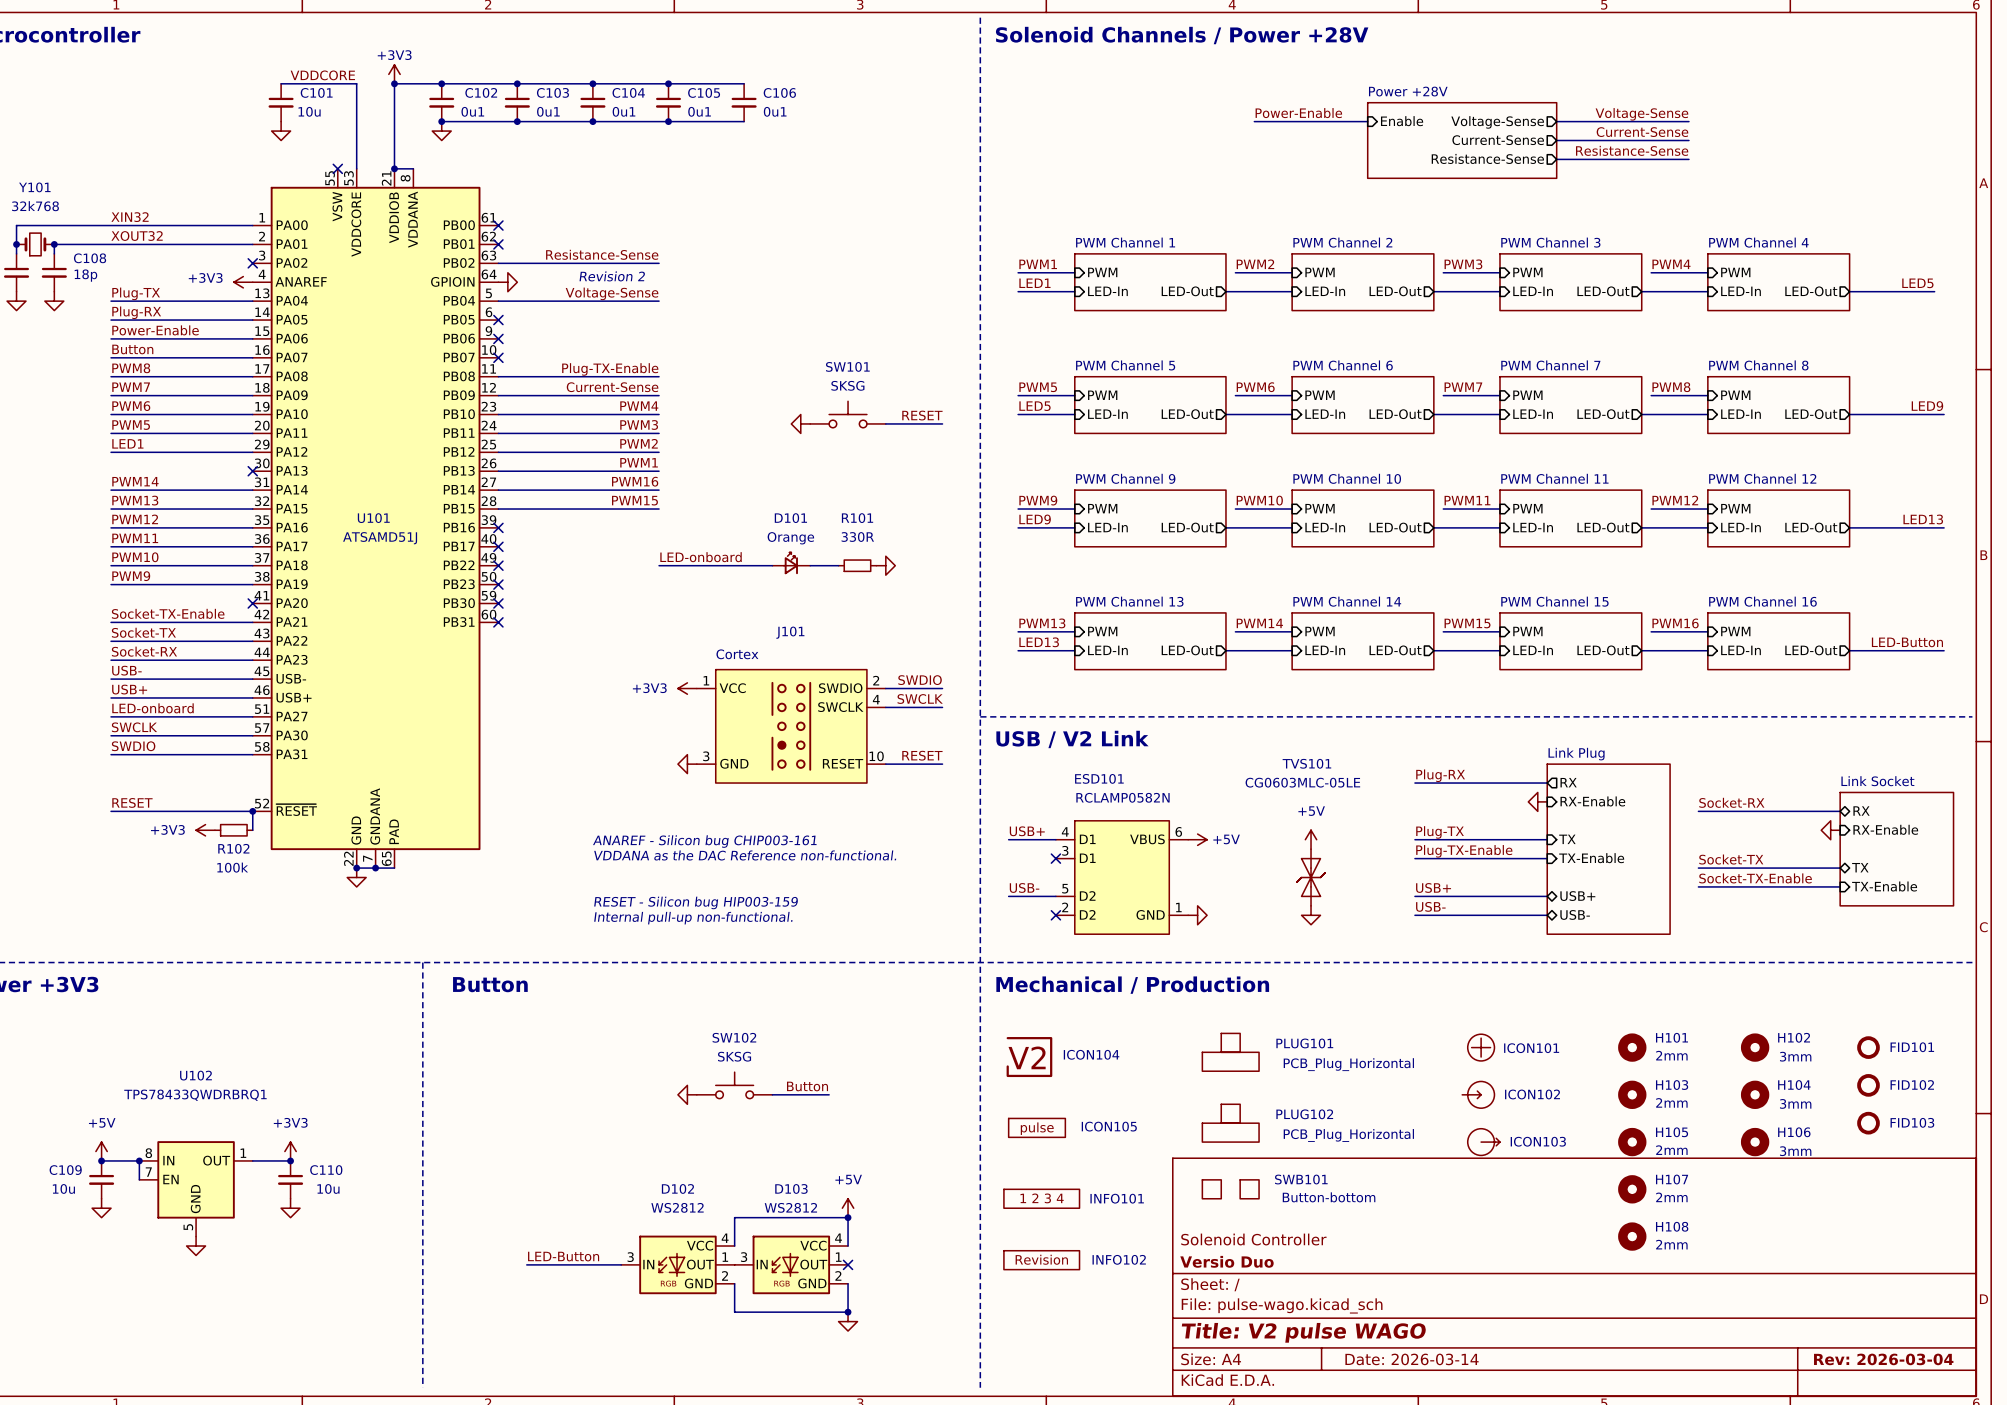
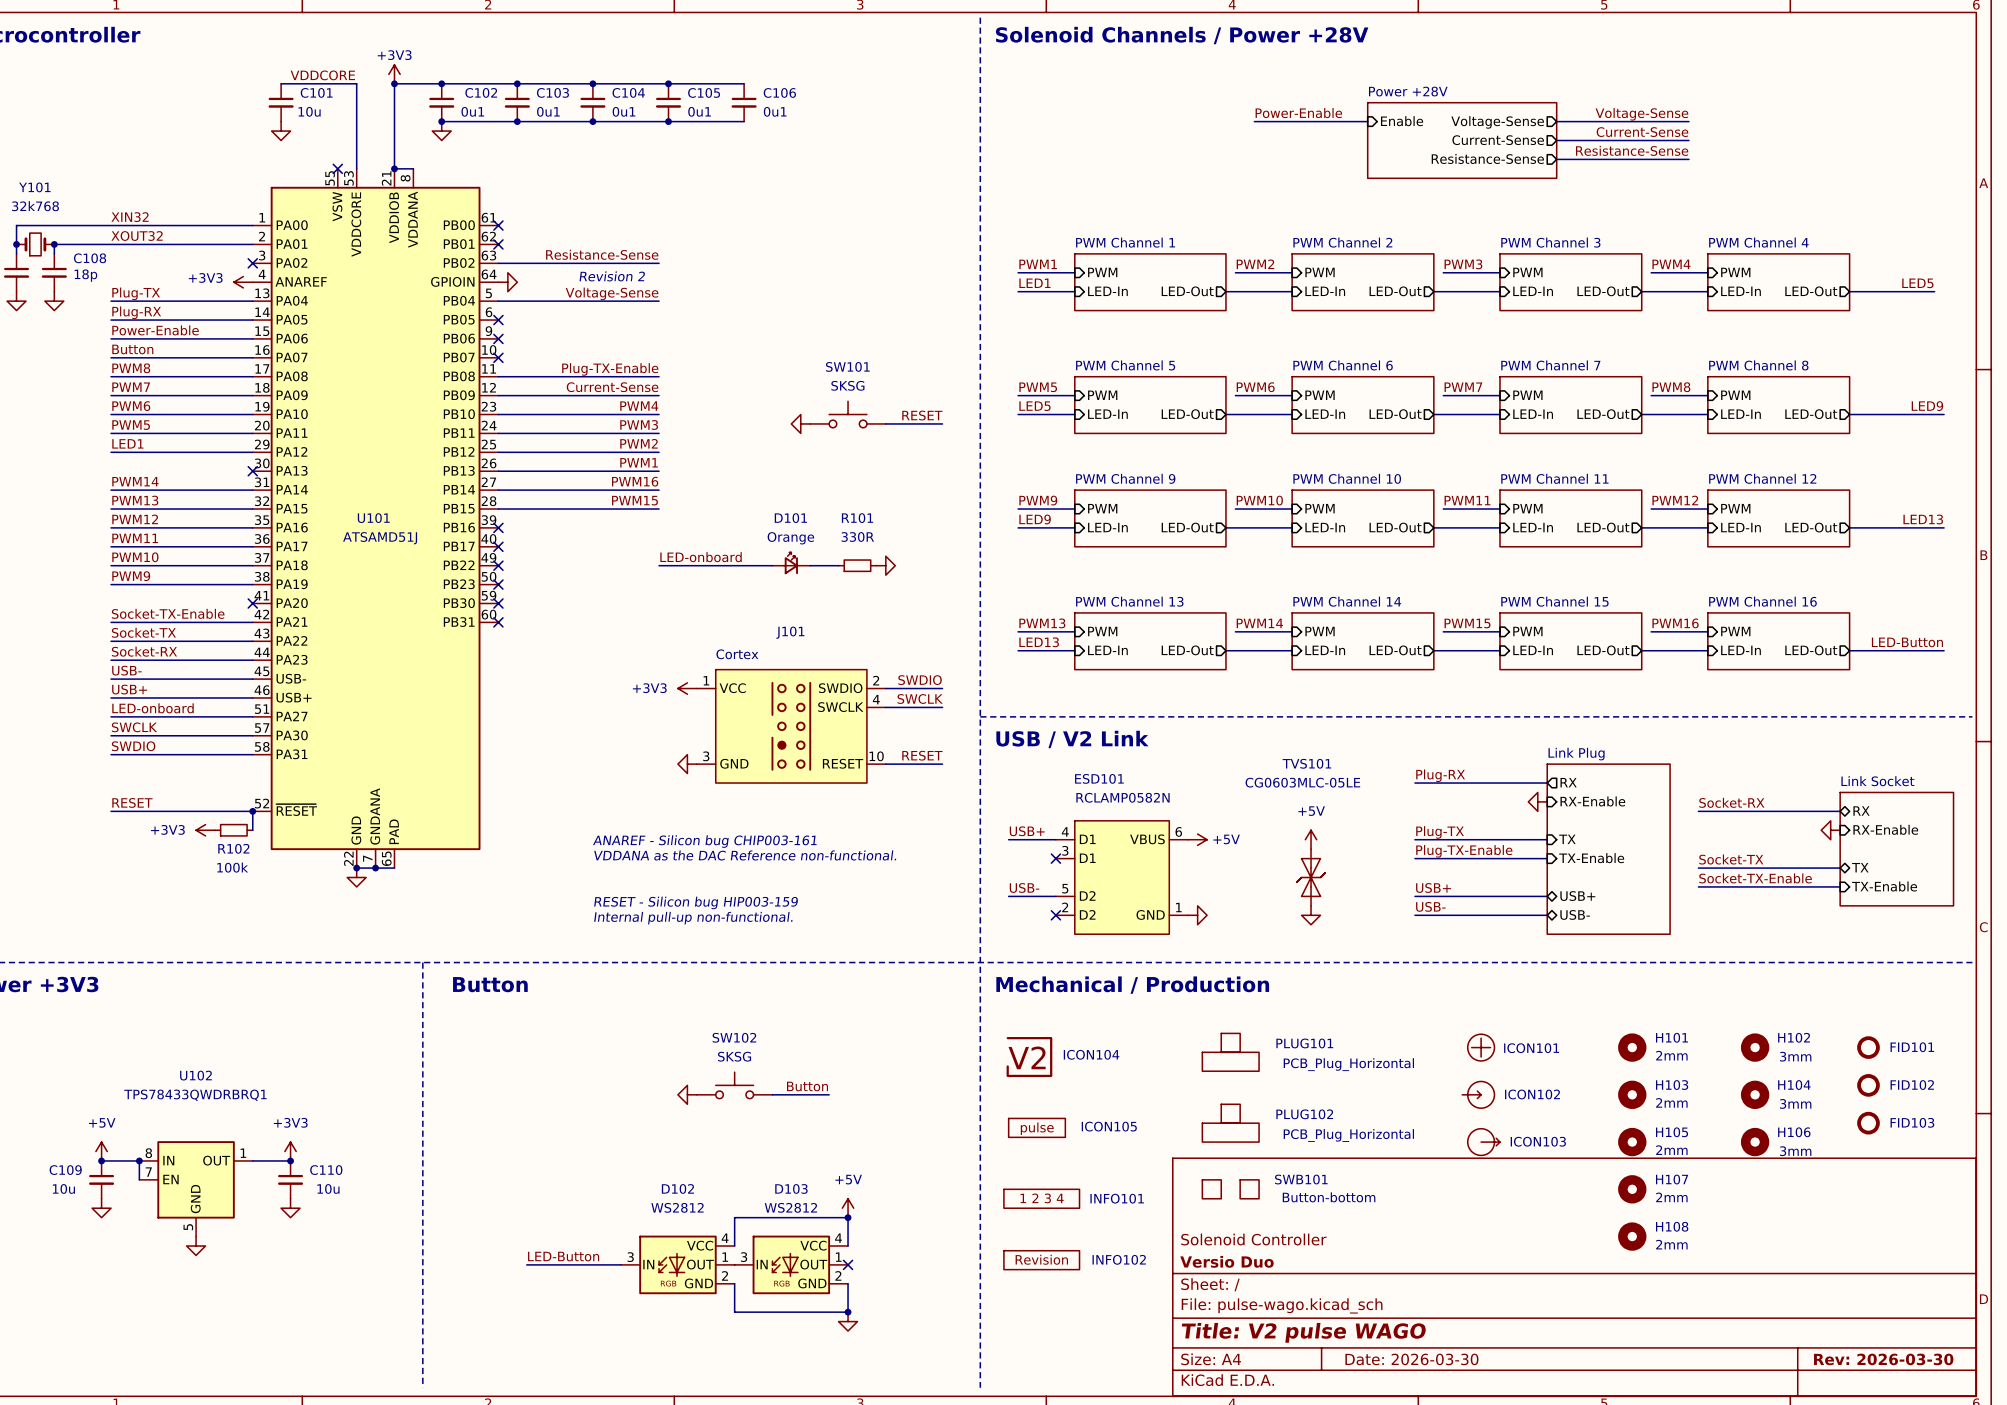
title block: Date: 2026-03-14 (1412, 1359) -> Date: 2026-03-30 (1411, 1359)
title block: Rev: 2026-03-04 (1883, 1359) -> Rev: 2026-03-30 (1883, 1359)

